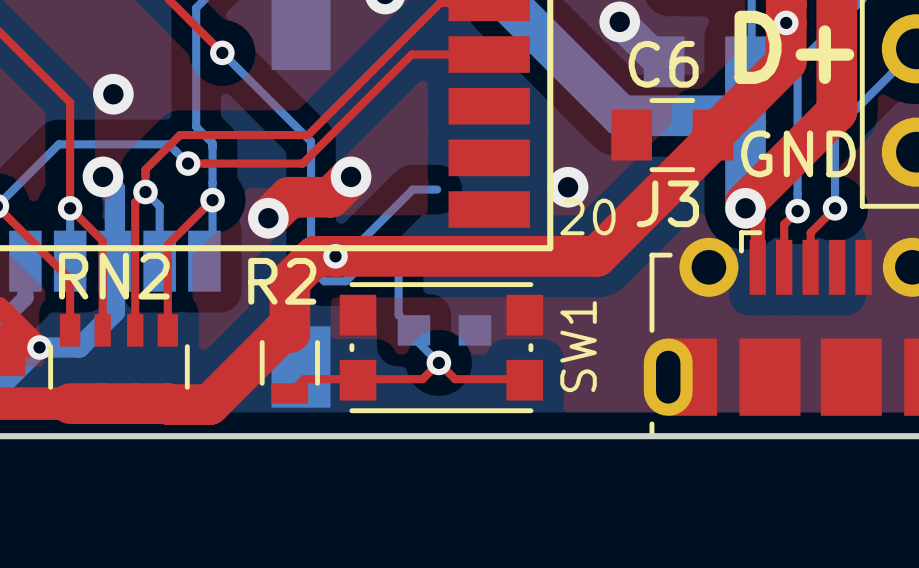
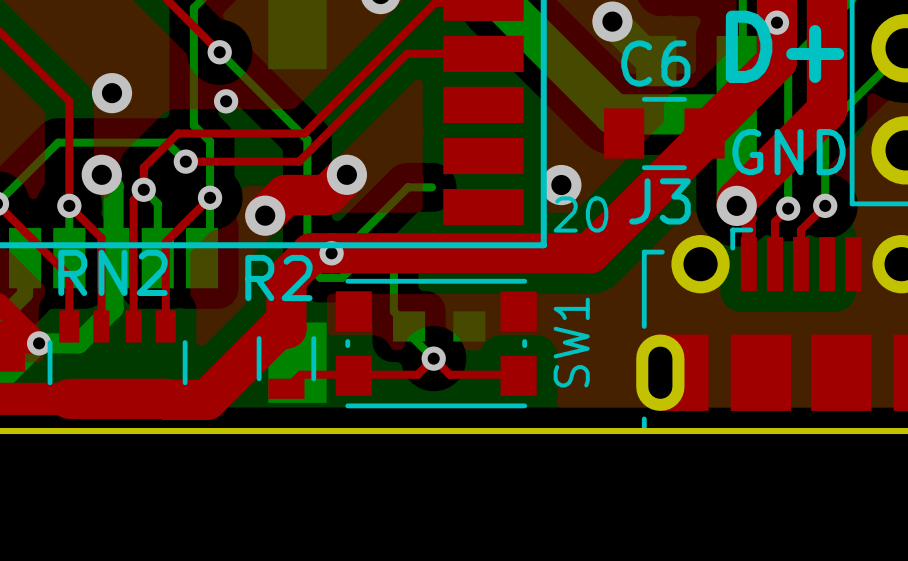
via: none -> (226, 101)

